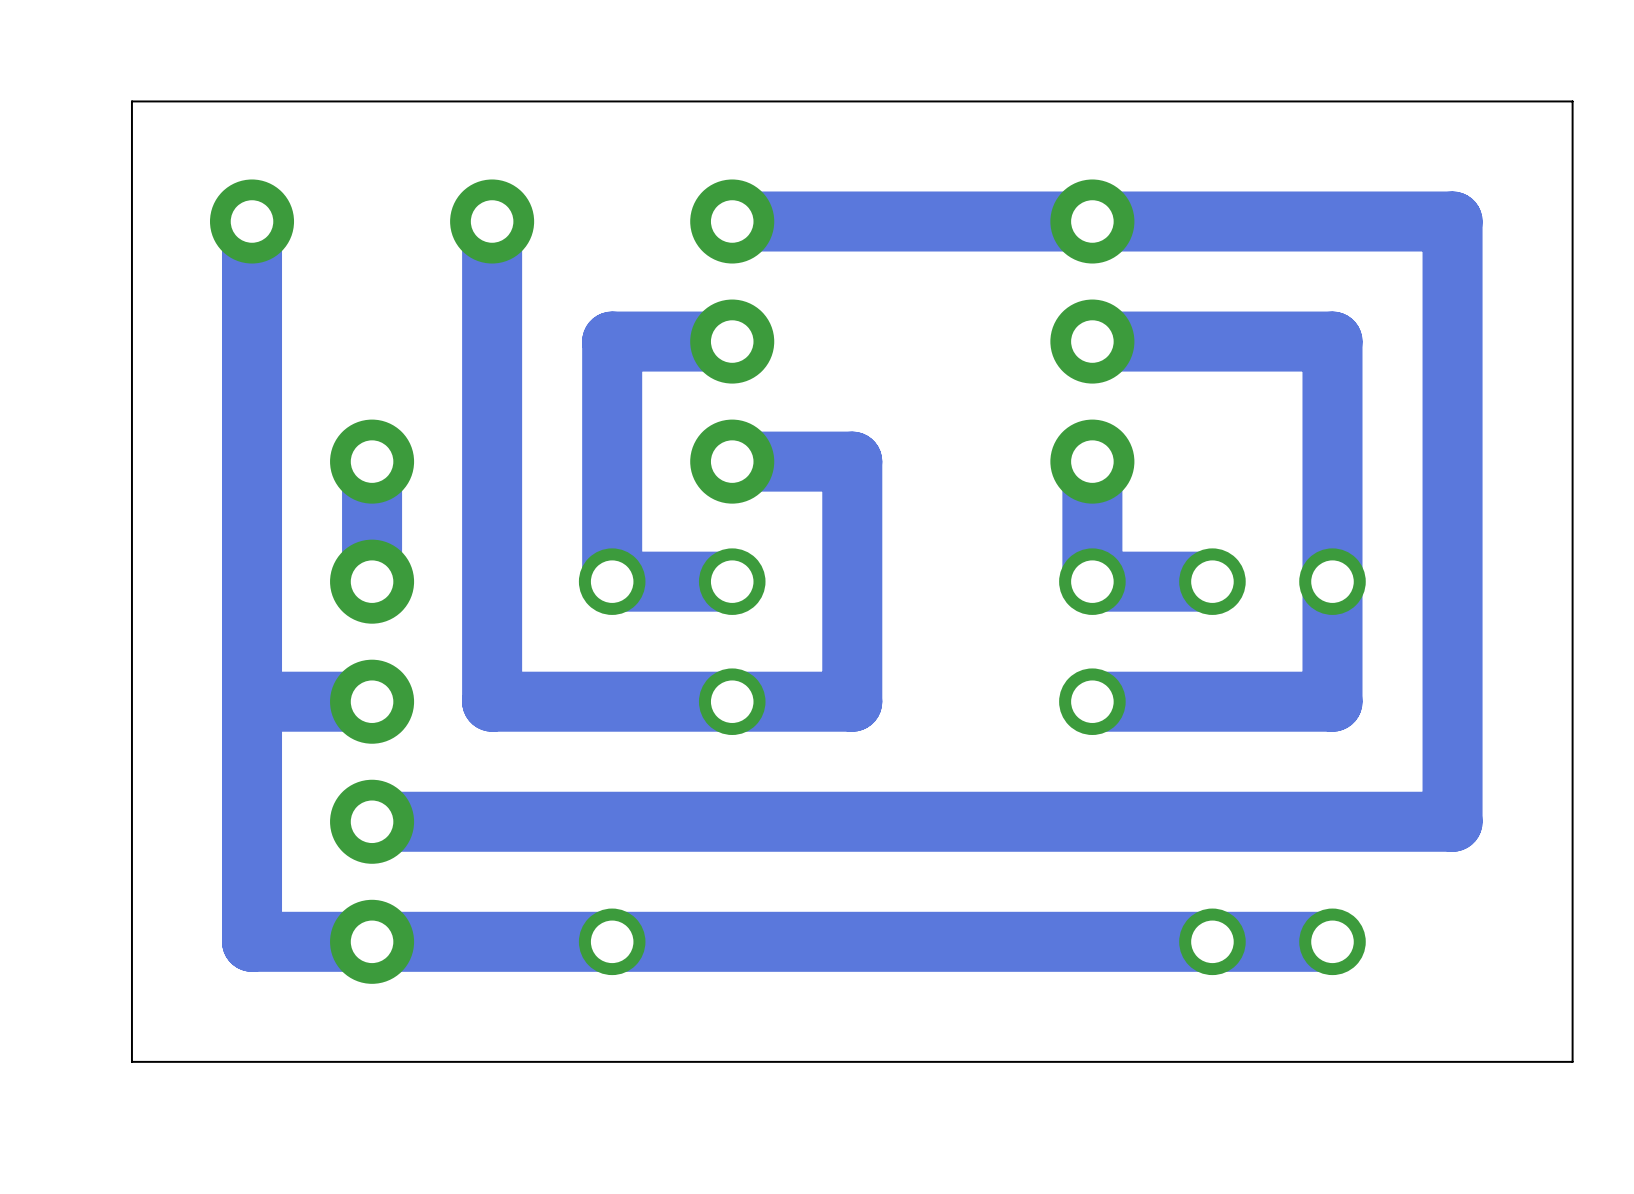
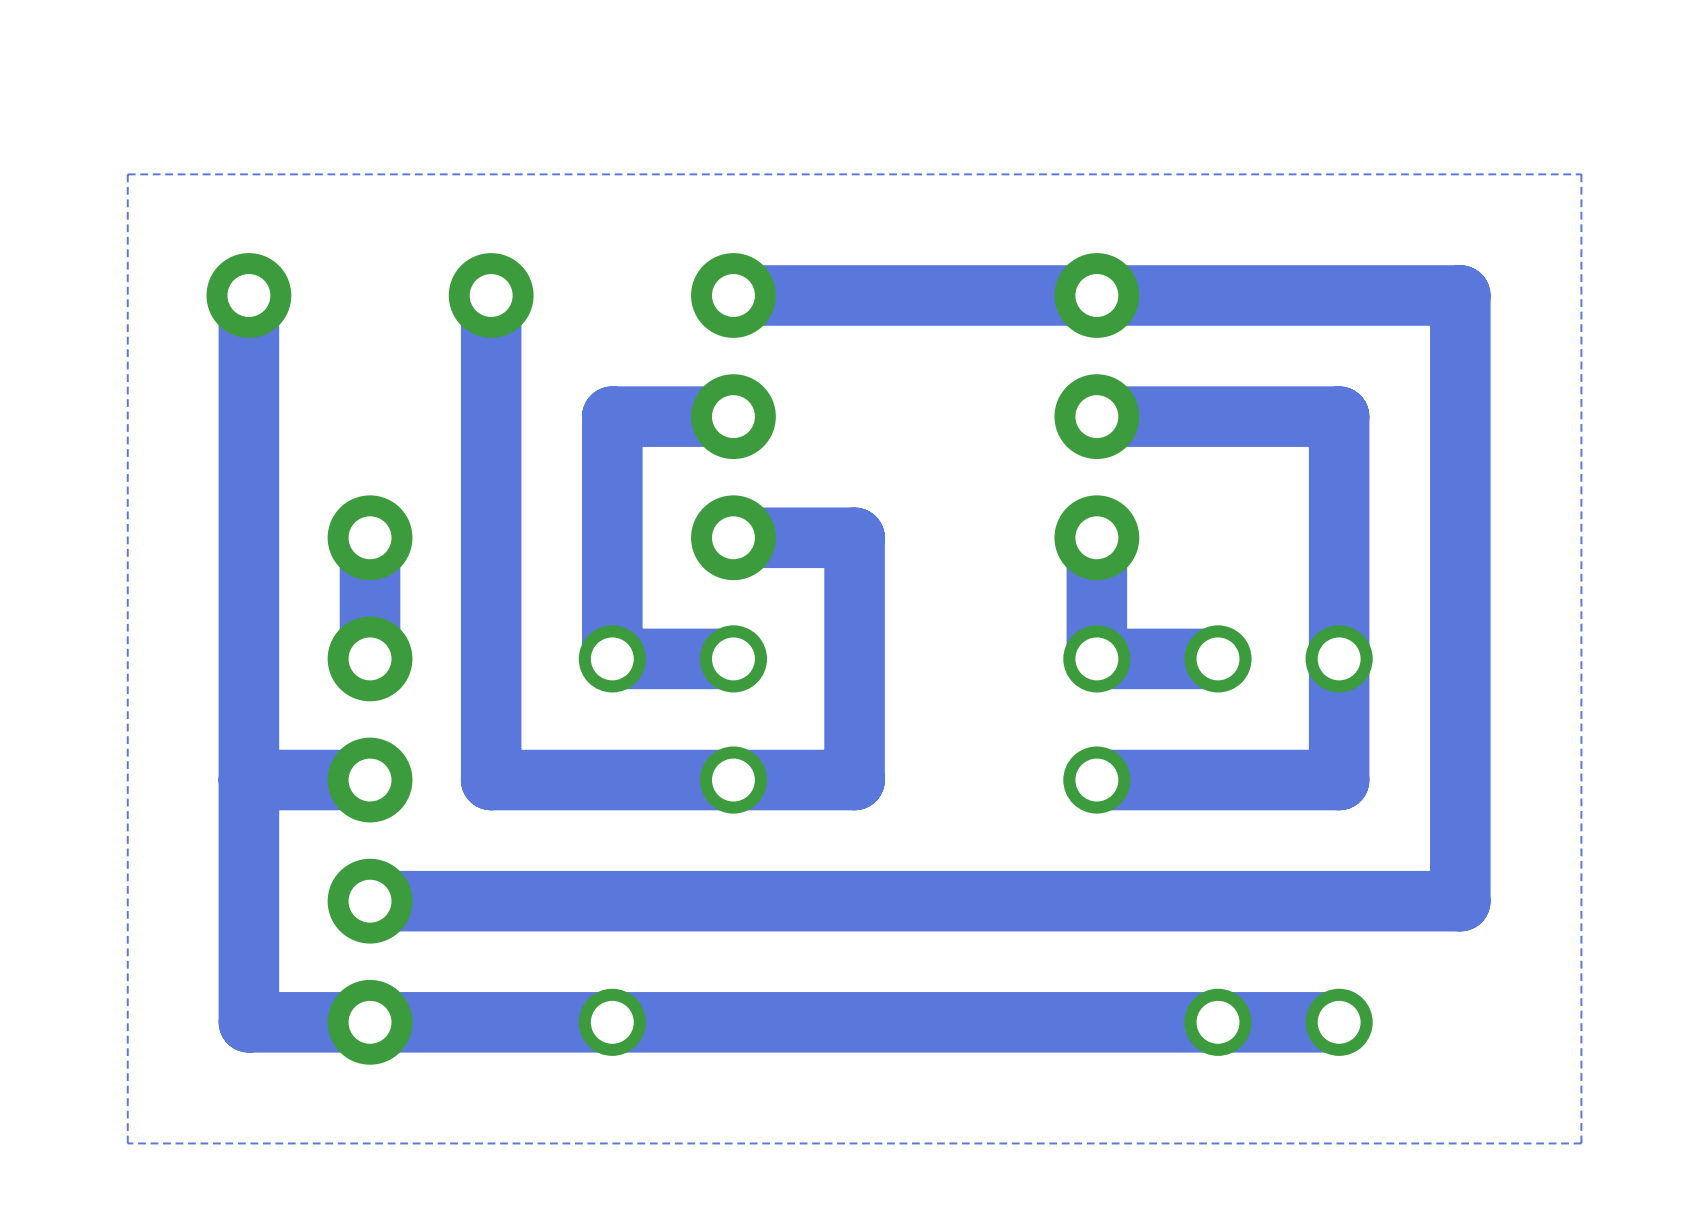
board edge: (1572, 101) (131, 101) (131, 1061) (1572, 1061) (1572, 101) -> none
zone outline: none -> (1581, 174) (1581, 1143) (127, 1143) (127, 174) (1581, 174)

